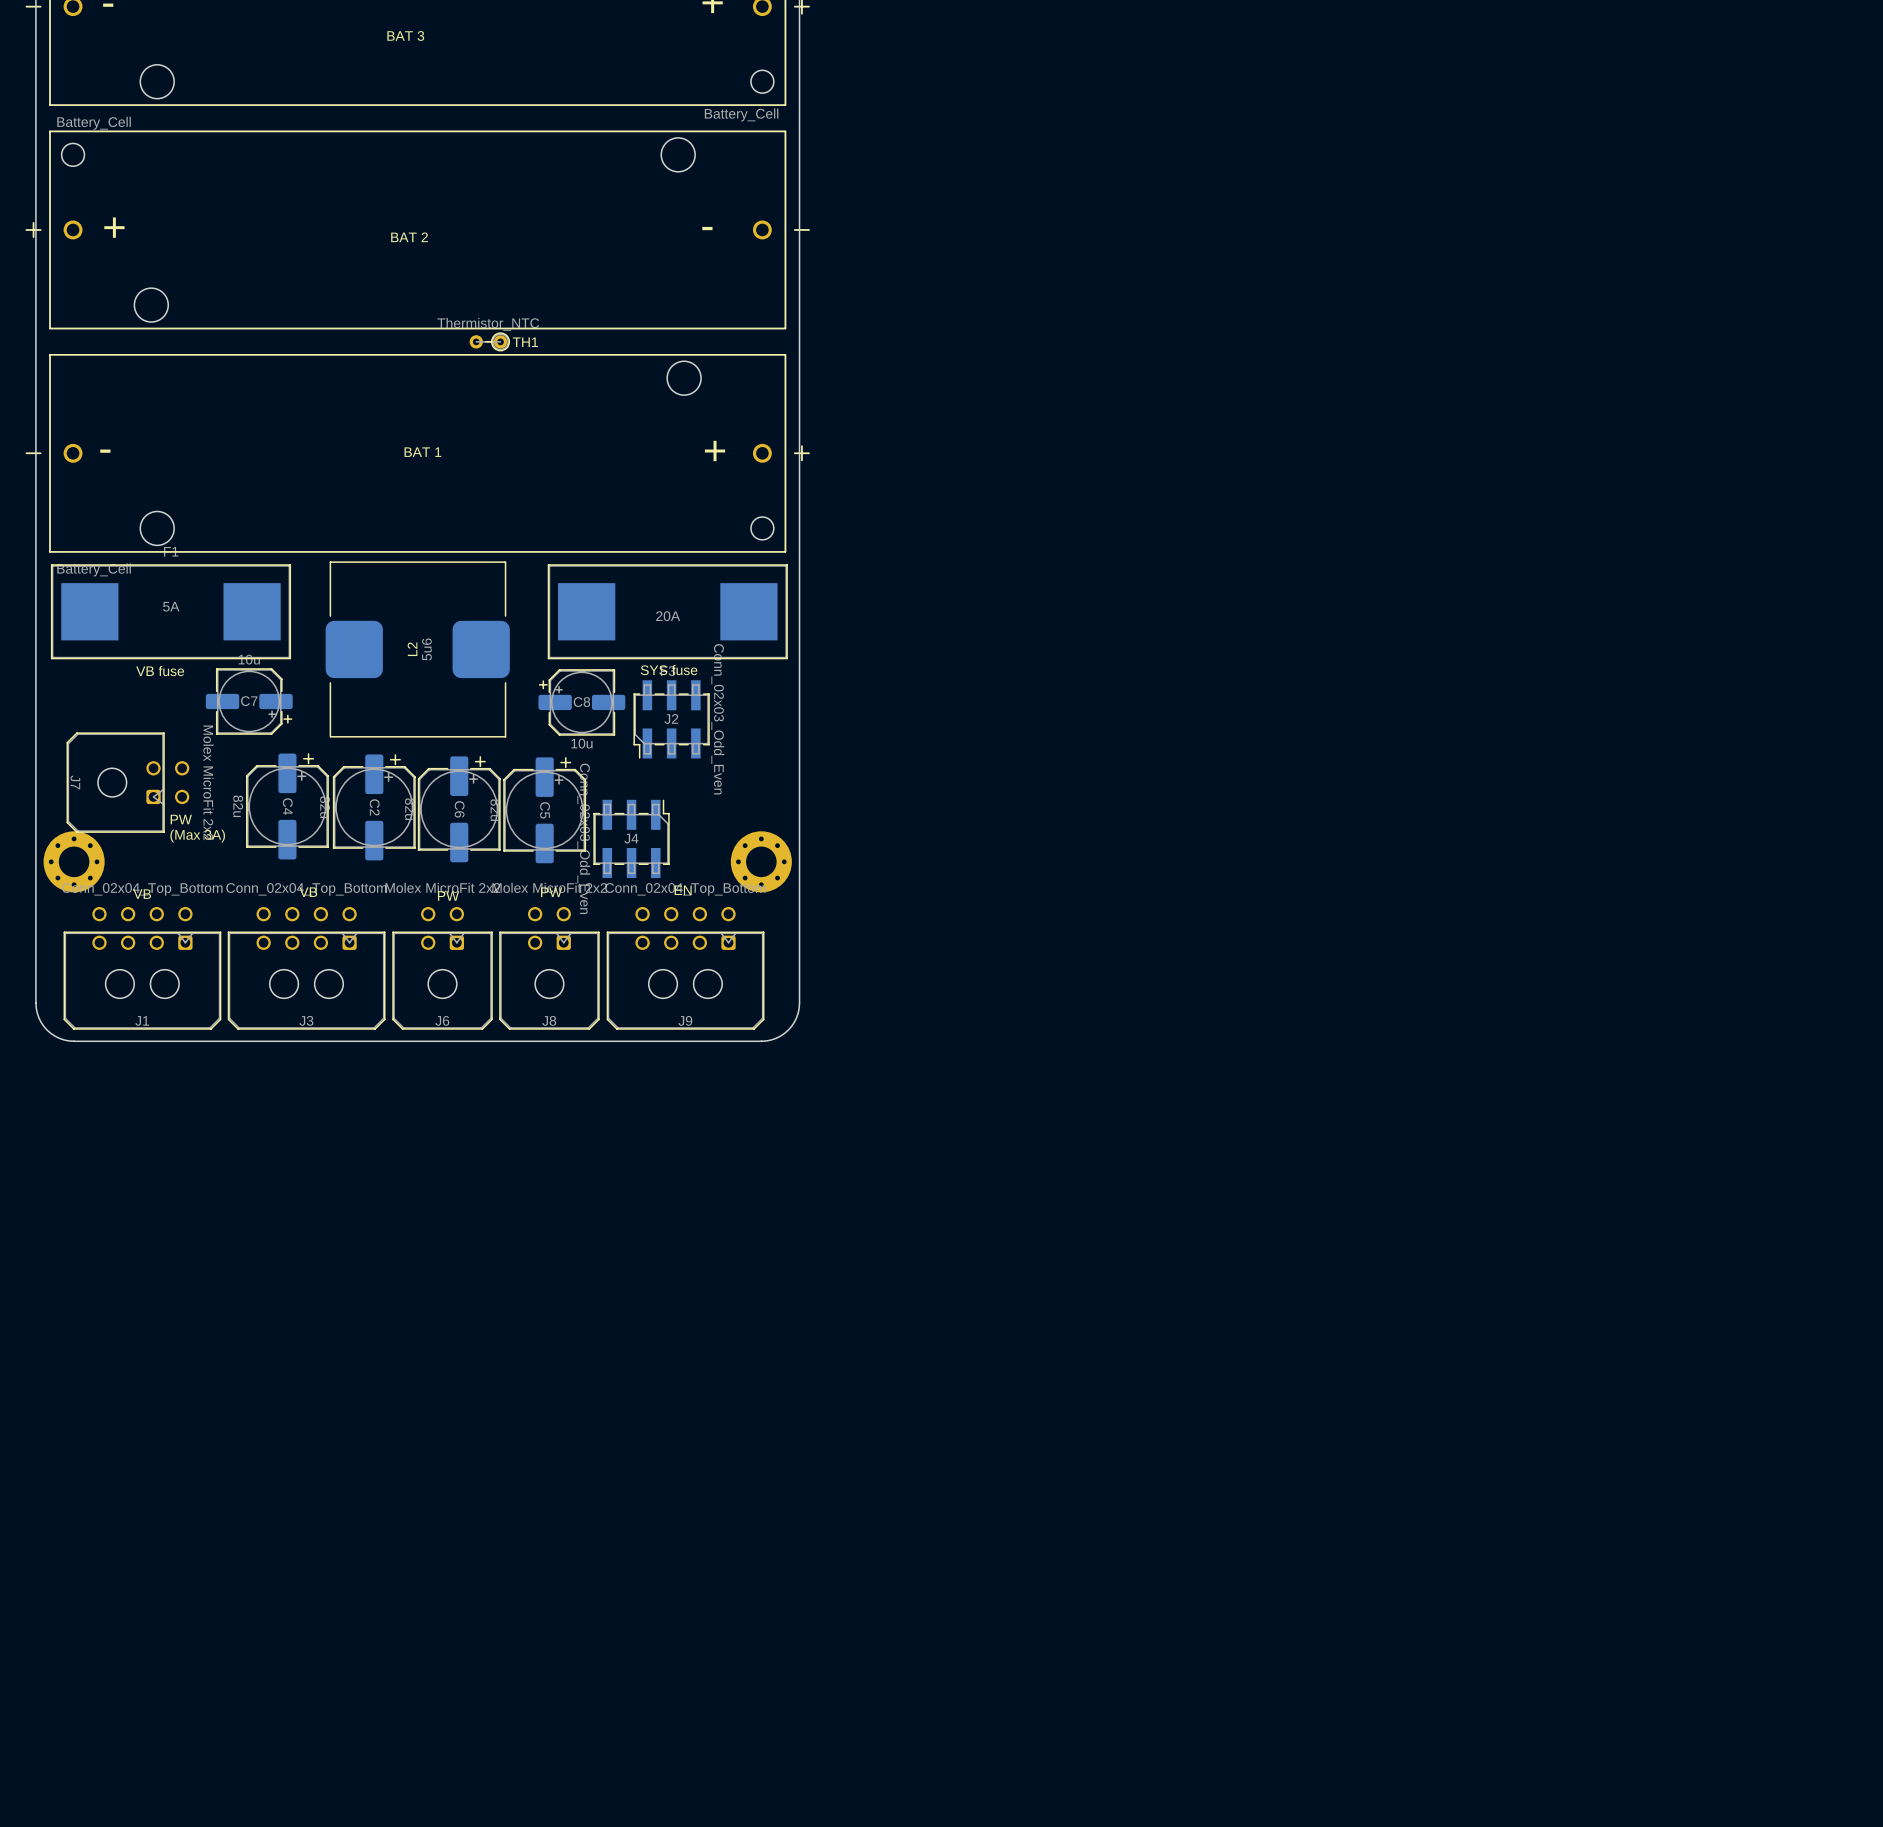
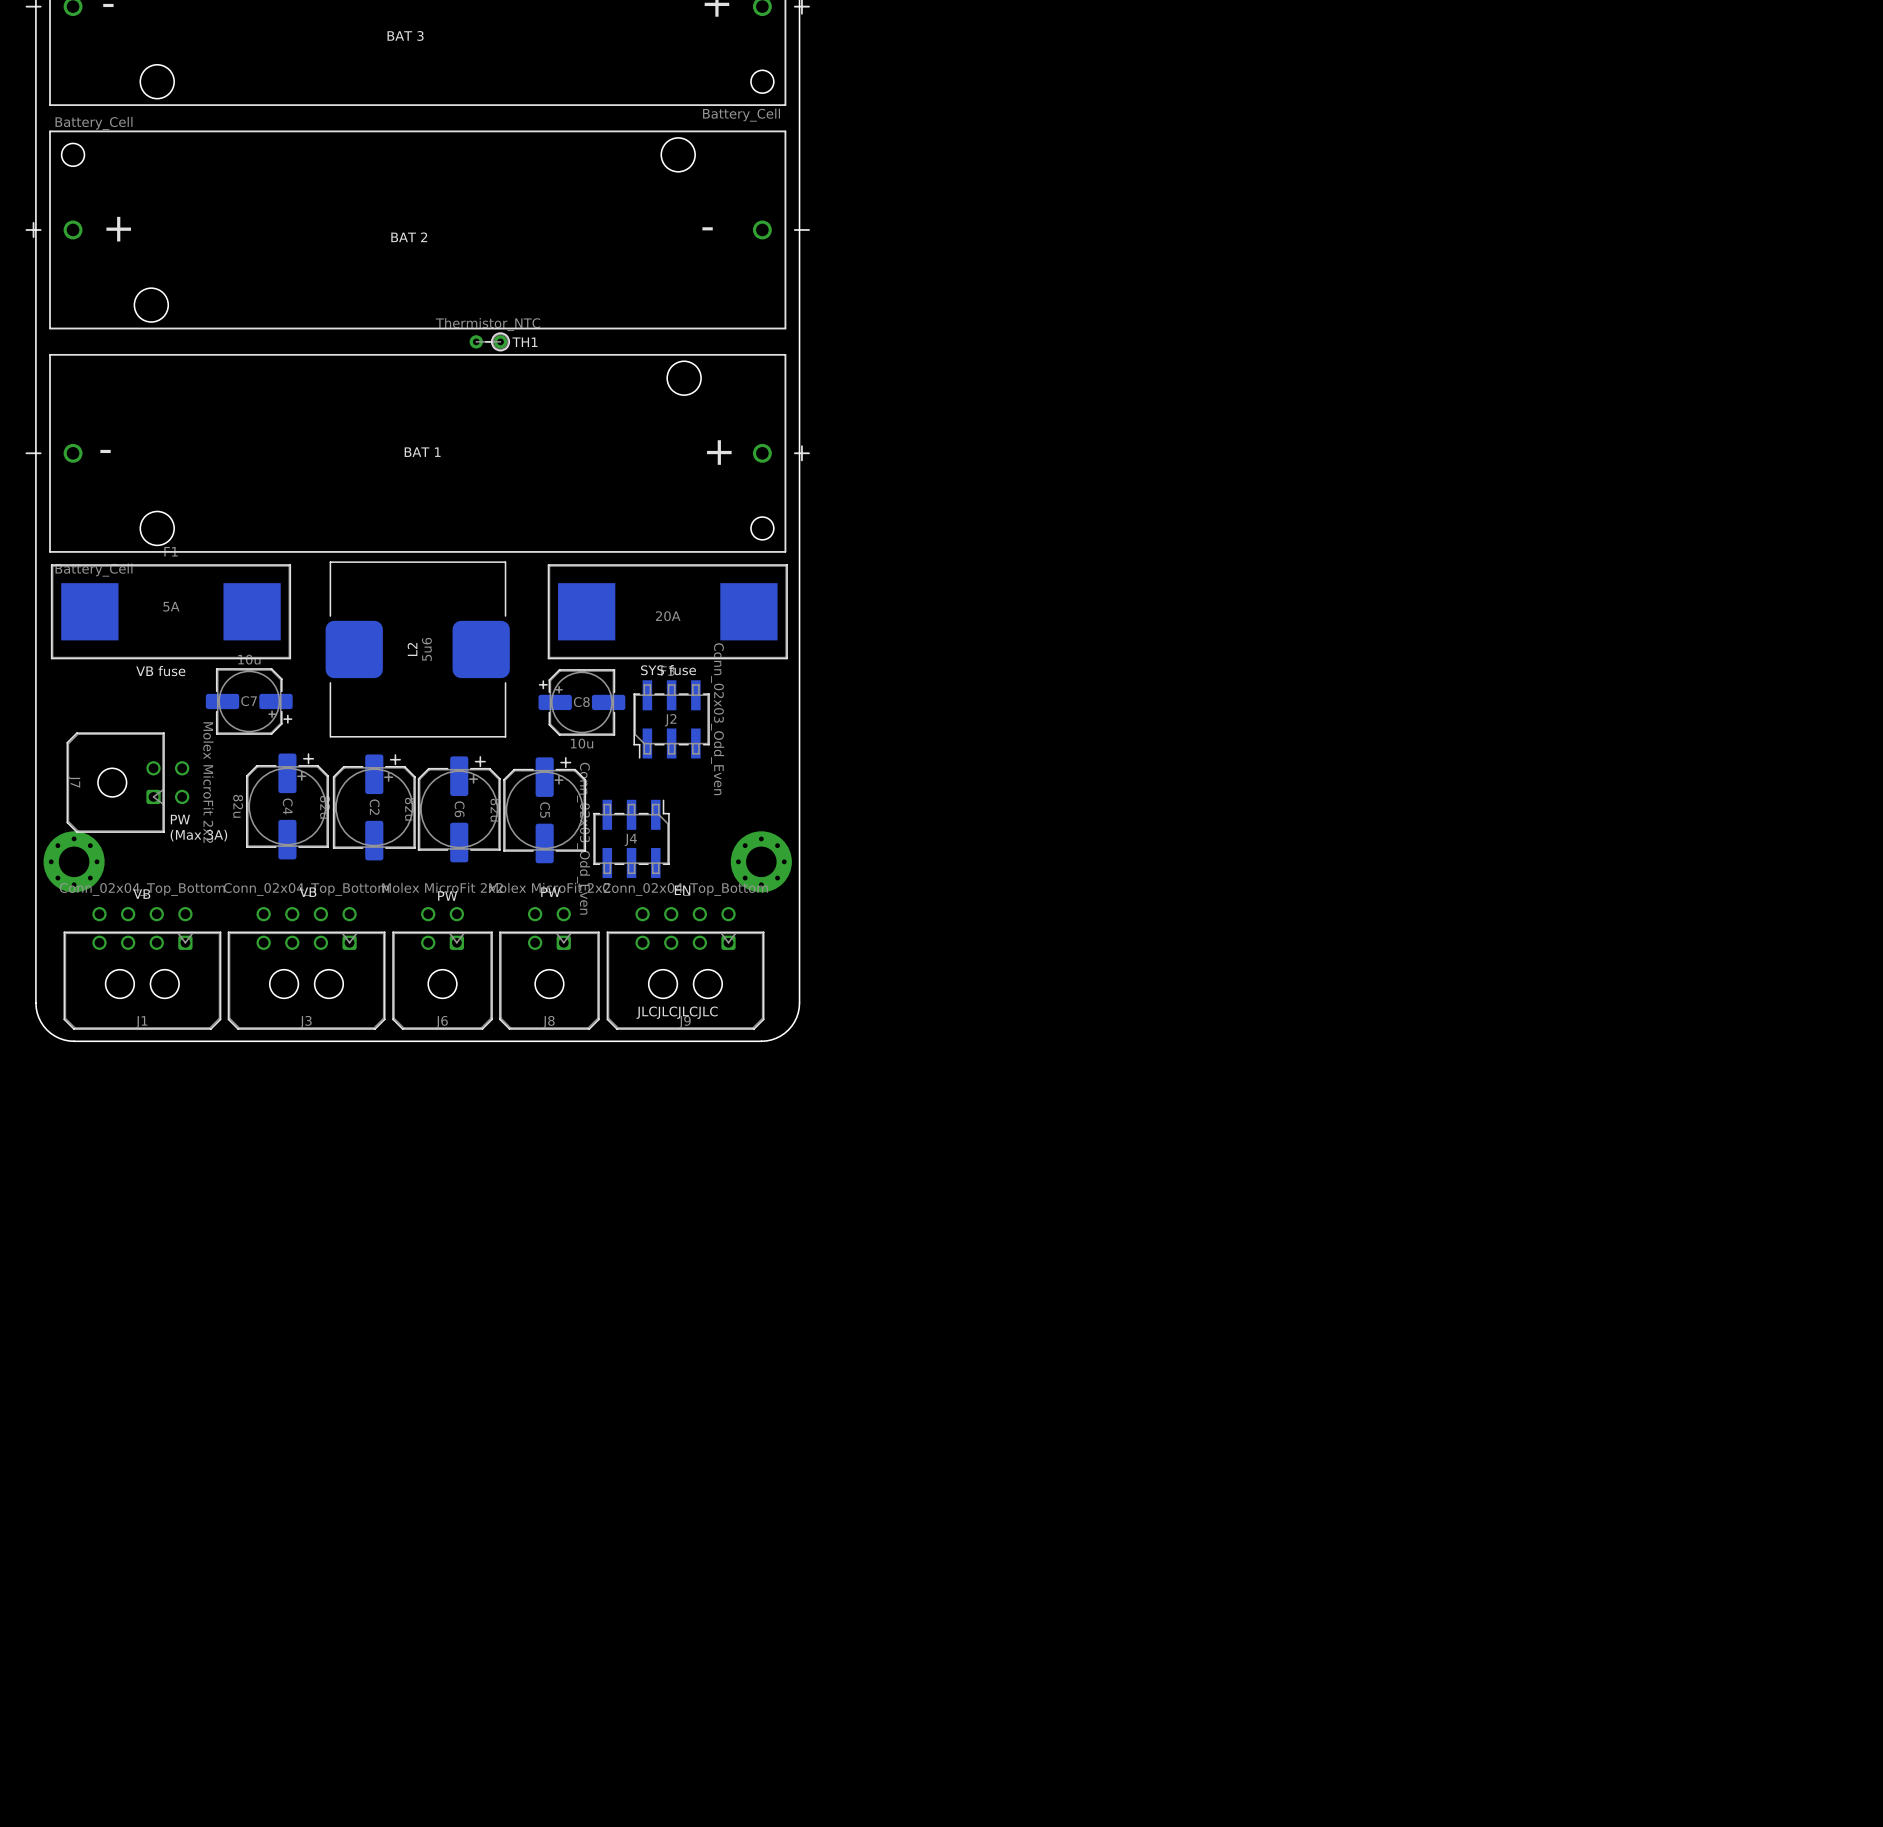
text: none -> JLCJLCJLCJLC (677, 1012)

